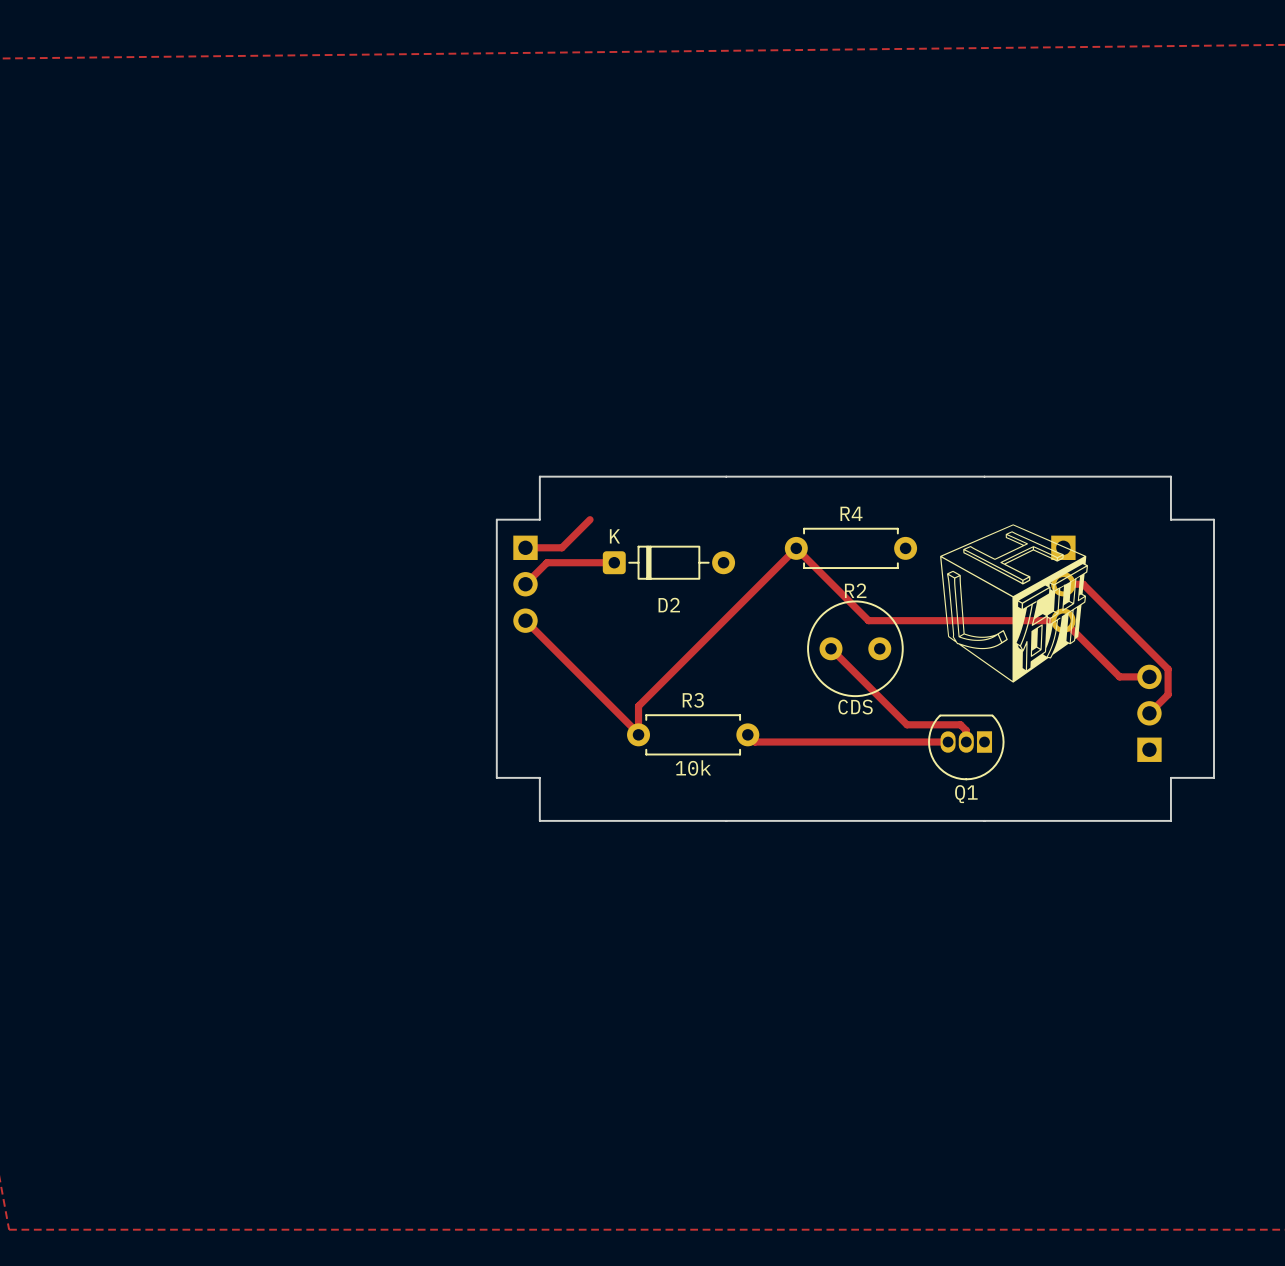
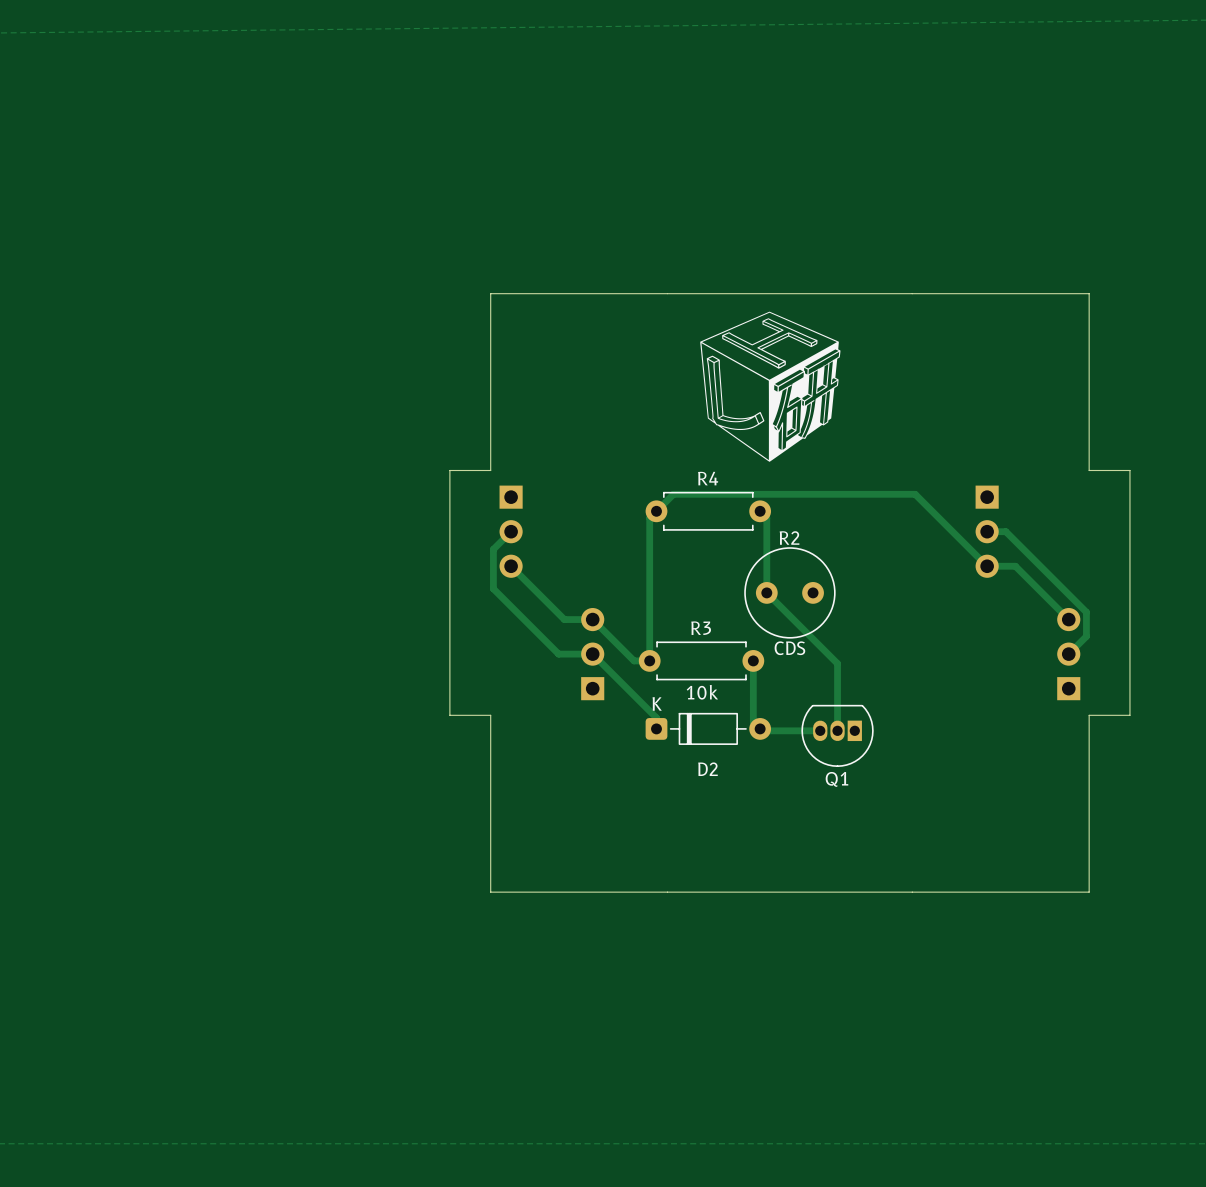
board edge: (539, 476) (1170, 476) -> (490, 429) (490, 293) (1089, 293) (1089, 429)
track: (590, 519) (561, 547) (525, 547) -> none
R4 position: (850, 548) -> (708, 511)
track: (614, 562) (547, 562) (525, 584) -> none
D2 position: (668, 562) -> (708, 728)
track: none -> (760, 511) (766, 517) (766, 592)
part position: (525, 584) -> (511, 531)
track: none -> (511, 531) (493, 549) (493, 588) (558, 654) (592, 654) (656, 717) (656, 728)
drawing position: (1014, 603) -> (770, 386)
track: (525, 620) (638, 733) -> none
track: (1149, 676) (1119, 676) (1063, 620) (868, 620) (796, 548) (638, 706) (638, 734) -> (1068, 619) (1015, 566) (987, 566) (915, 494) (673, 494) (649, 518) (649, 660) (634, 660) (592, 619) (564, 619) (511, 566)
part: none -> (592, 654)
track: none -> (753, 660) (753, 722) (762, 730) (820, 730)
track: (905, 723) (960, 724) (966, 730) (966, 742) -> (837, 663) (837, 730)
R3 position: (693, 734) -> (701, 660)
track: (747, 734) (755, 742) (948, 742) -> none
Q1 position: (966, 747) -> (837, 735)
board edge: (539, 820) (1170, 820) -> (490, 756) (490, 892) (1089, 892) (1089, 756)

